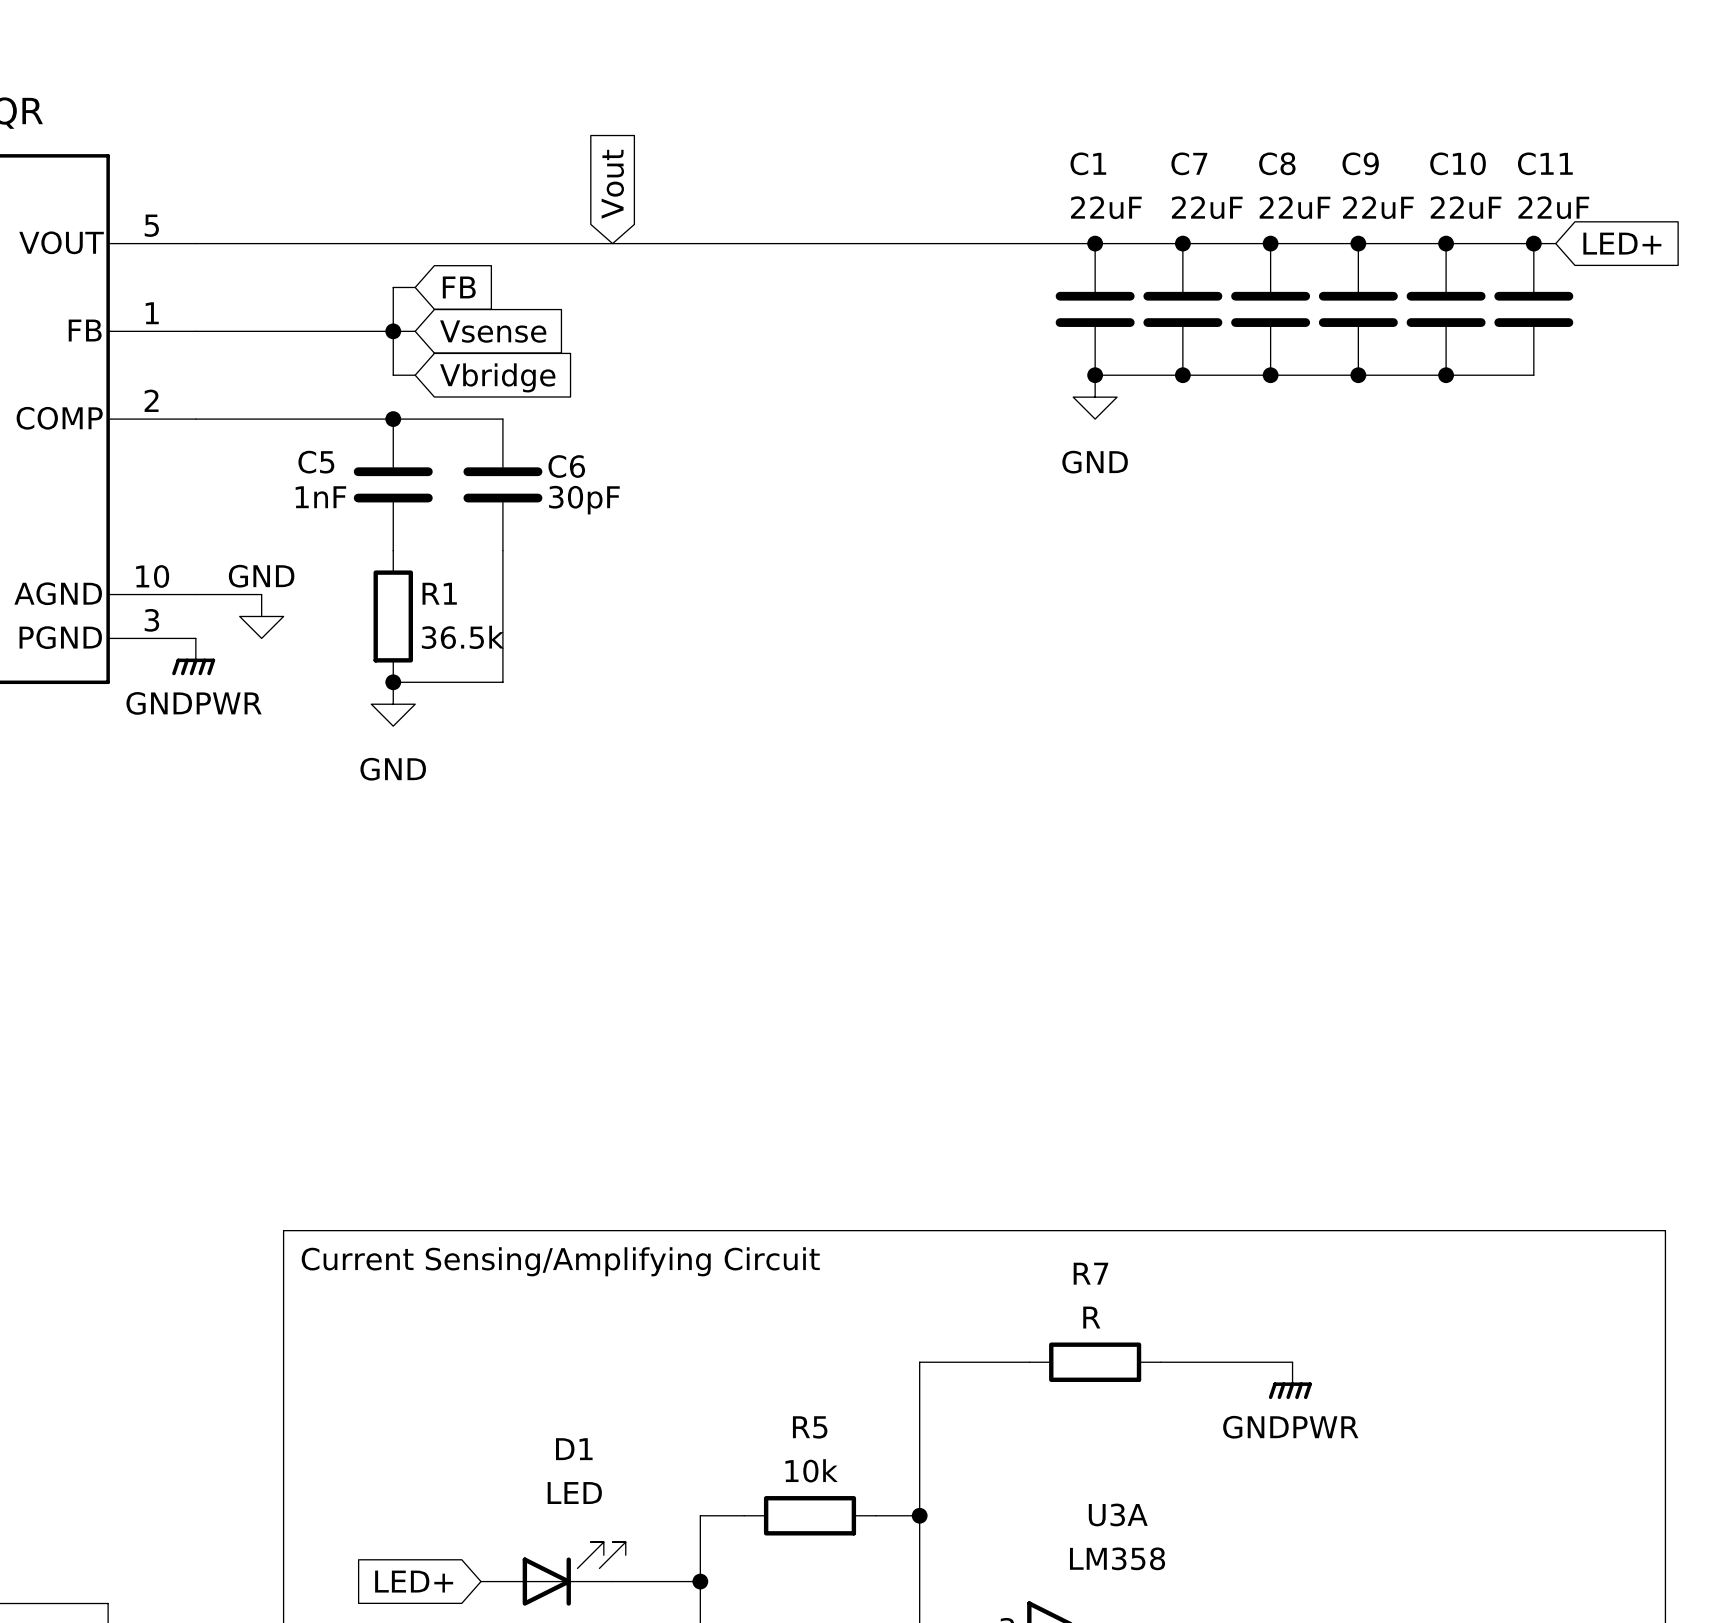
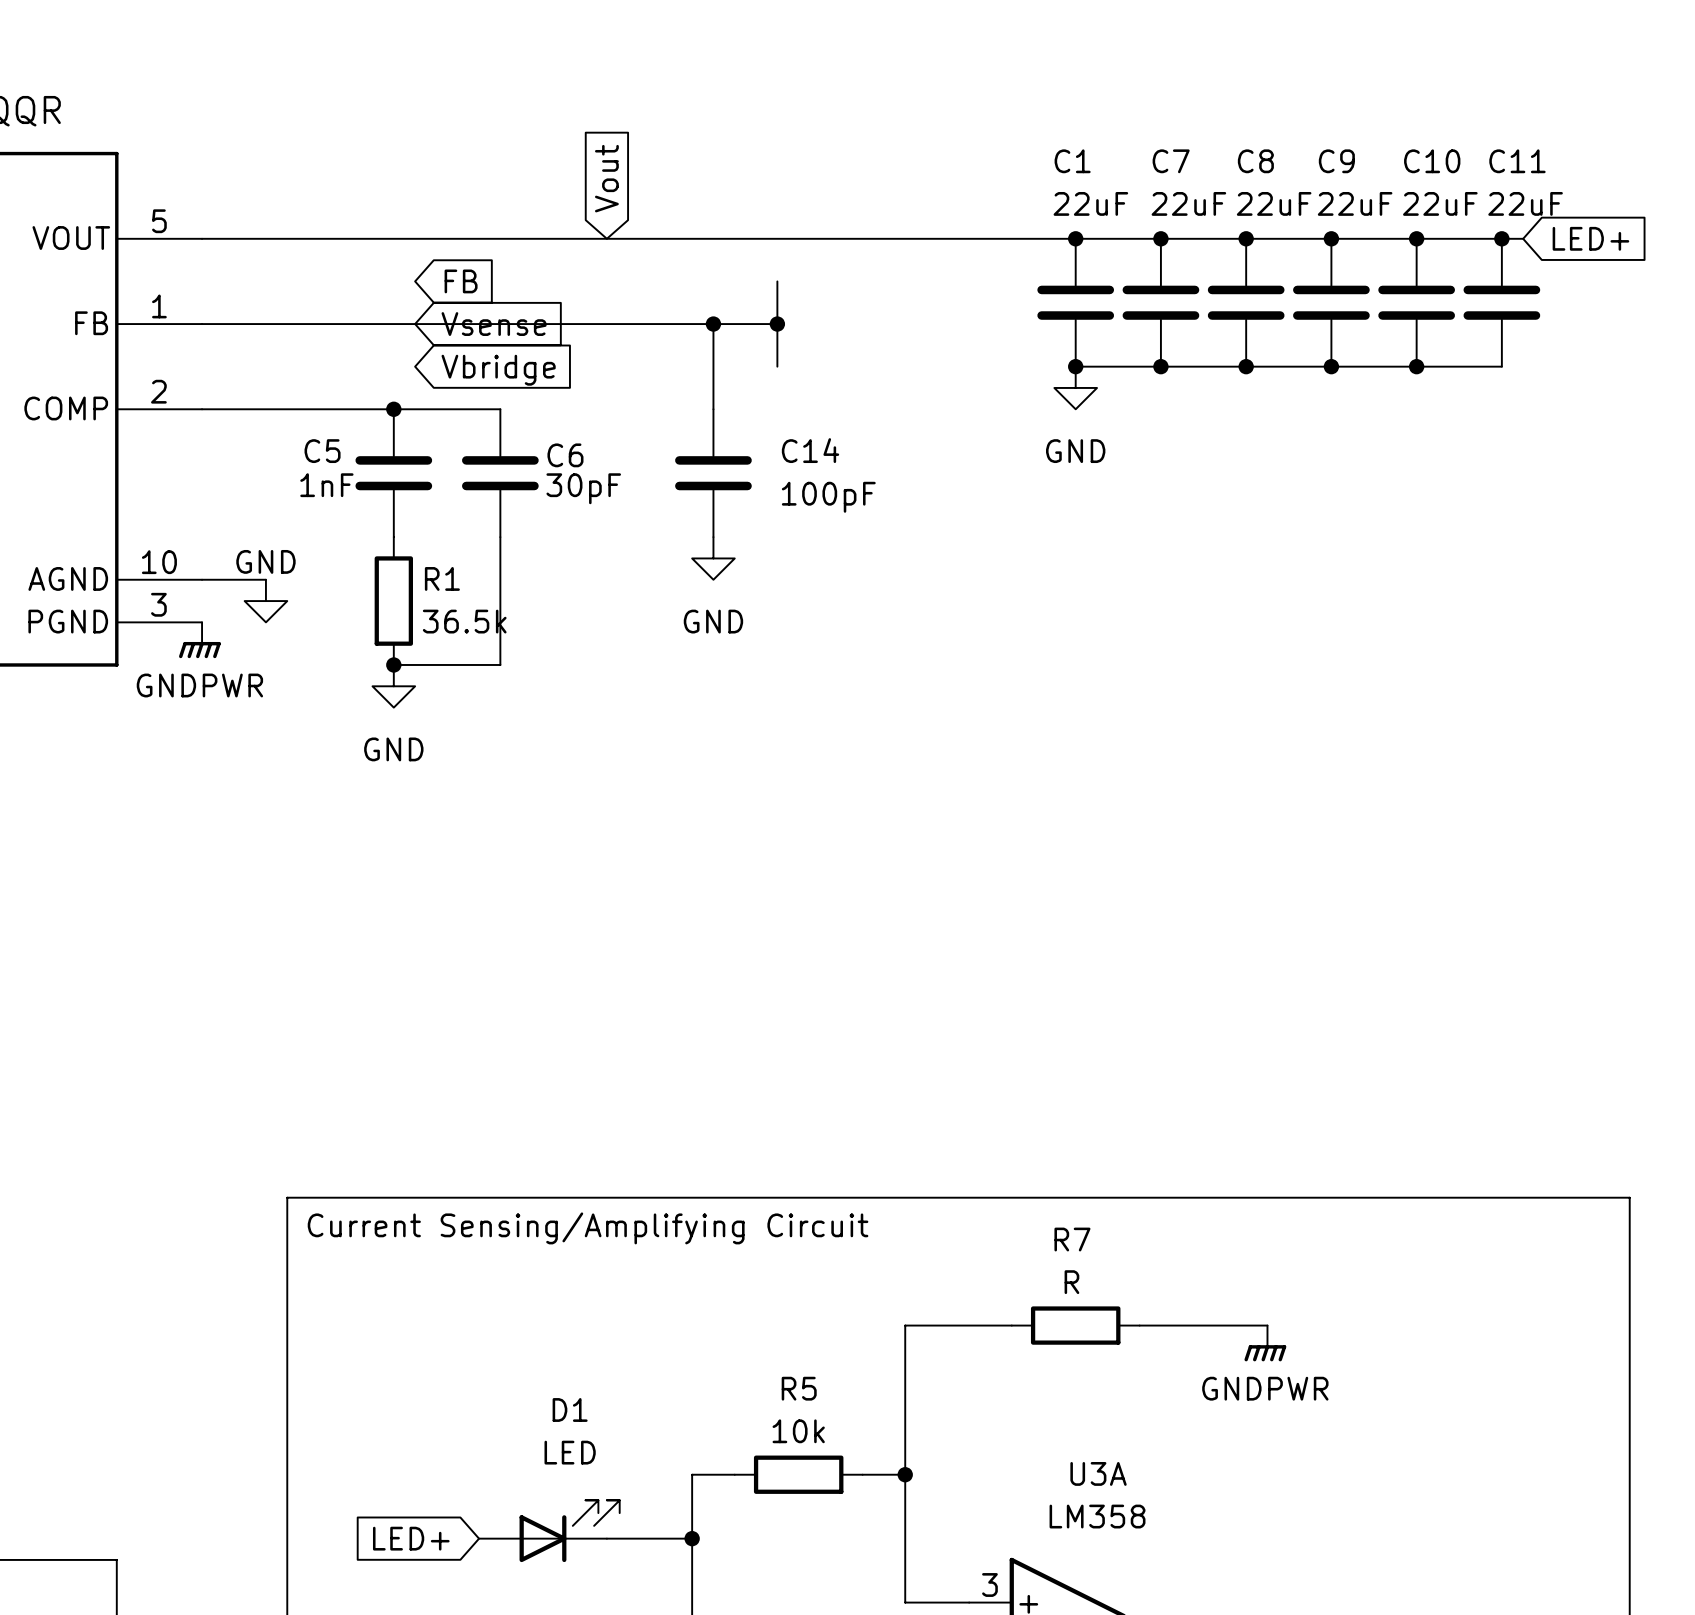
wire: (415, 287) (393, 287) (393, 375) (415, 375) -> none
wire: none -> (777, 281) (777, 366)
junction: (393, 331) -> none
wire: none -> (415, 324) (777, 324)
wire: none -> (713, 324) (713, 409)
junction: none -> (713, 324)
junction: none -> (777, 324)
C14: none -> 100pF (713, 473)
power symbol: none -> GND (713, 558)

